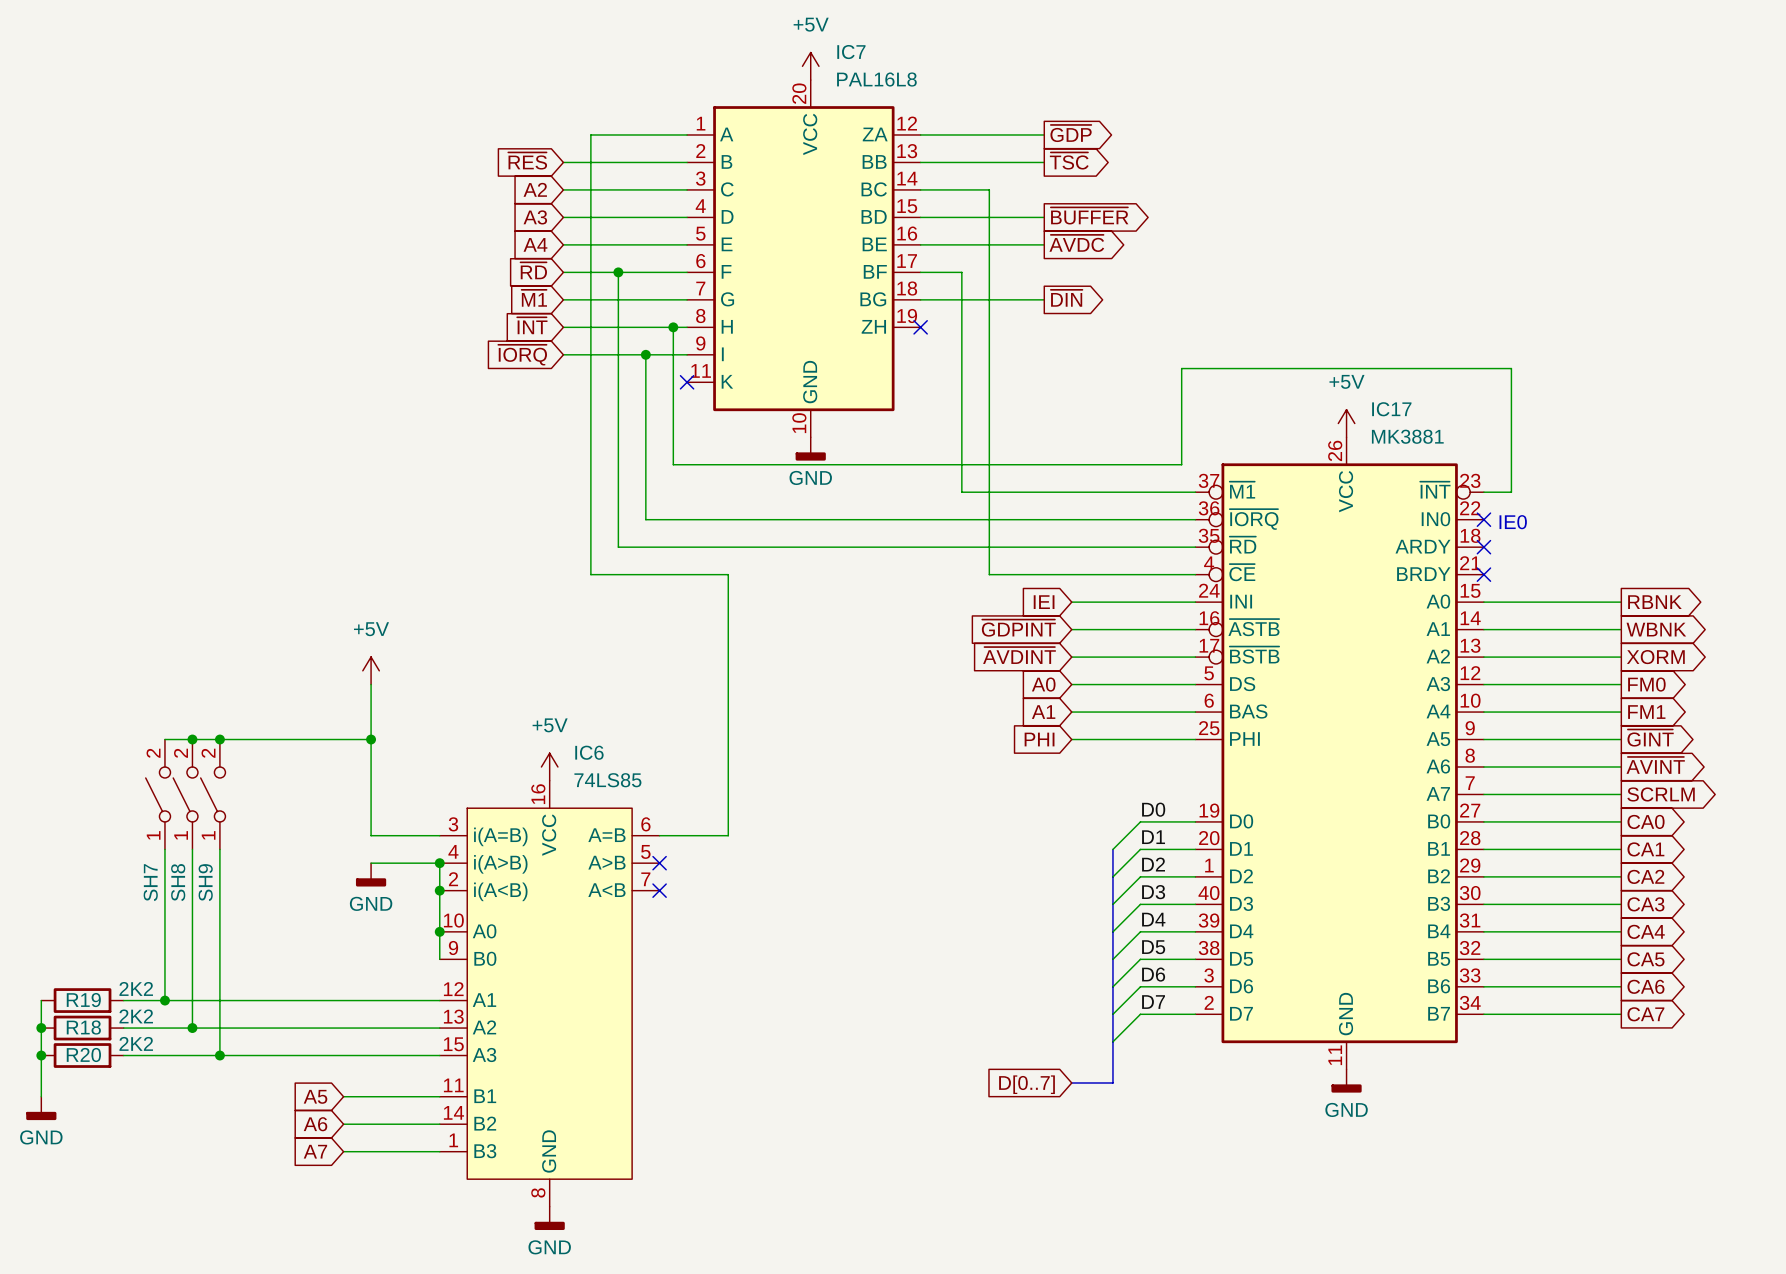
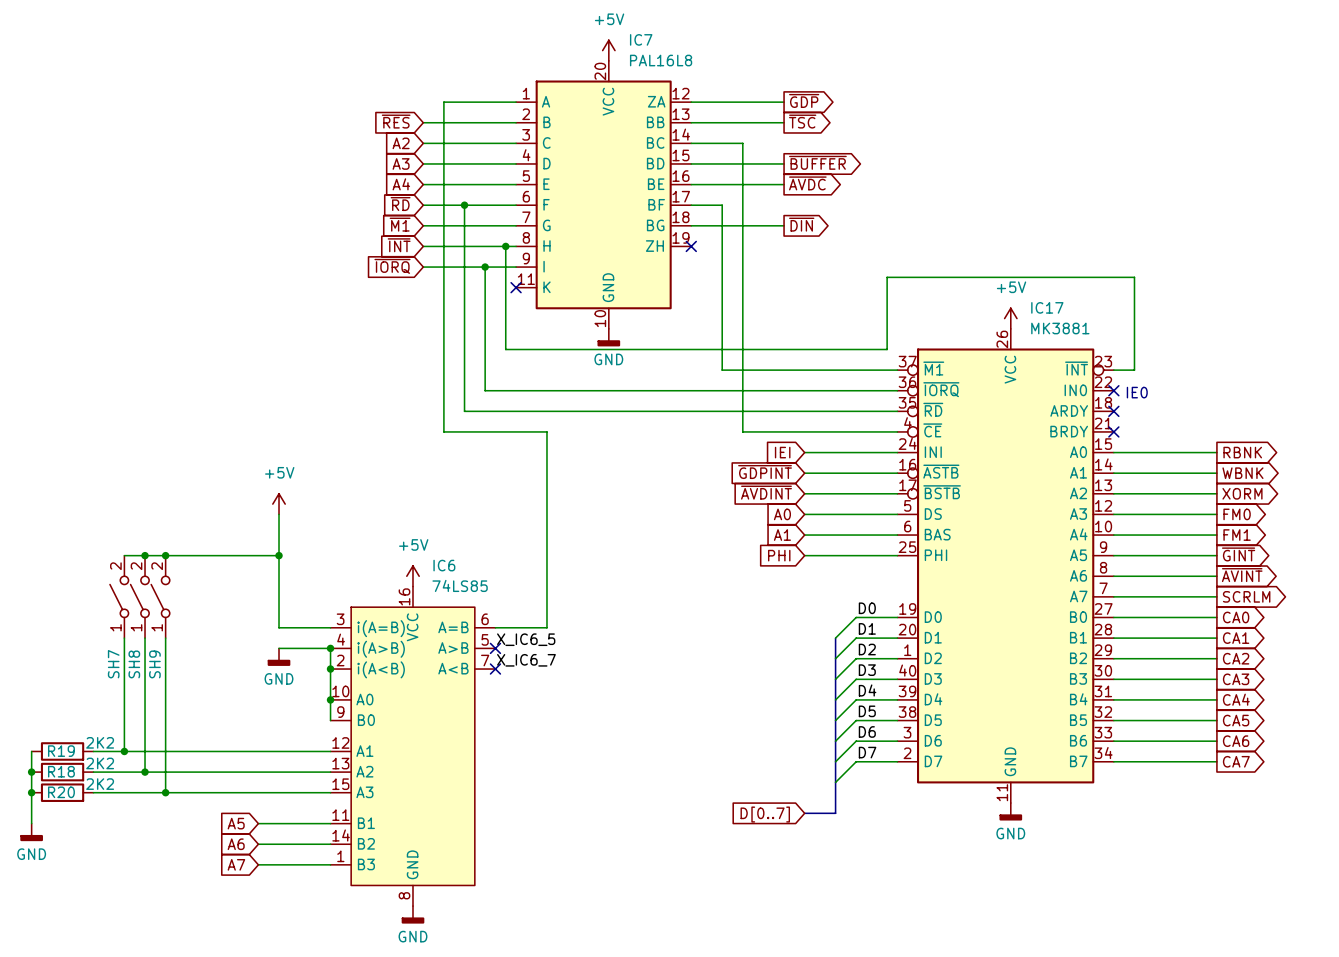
label: none -> X_IC6_5 (526, 639)
label: none -> X_IC6_7 (526, 660)

